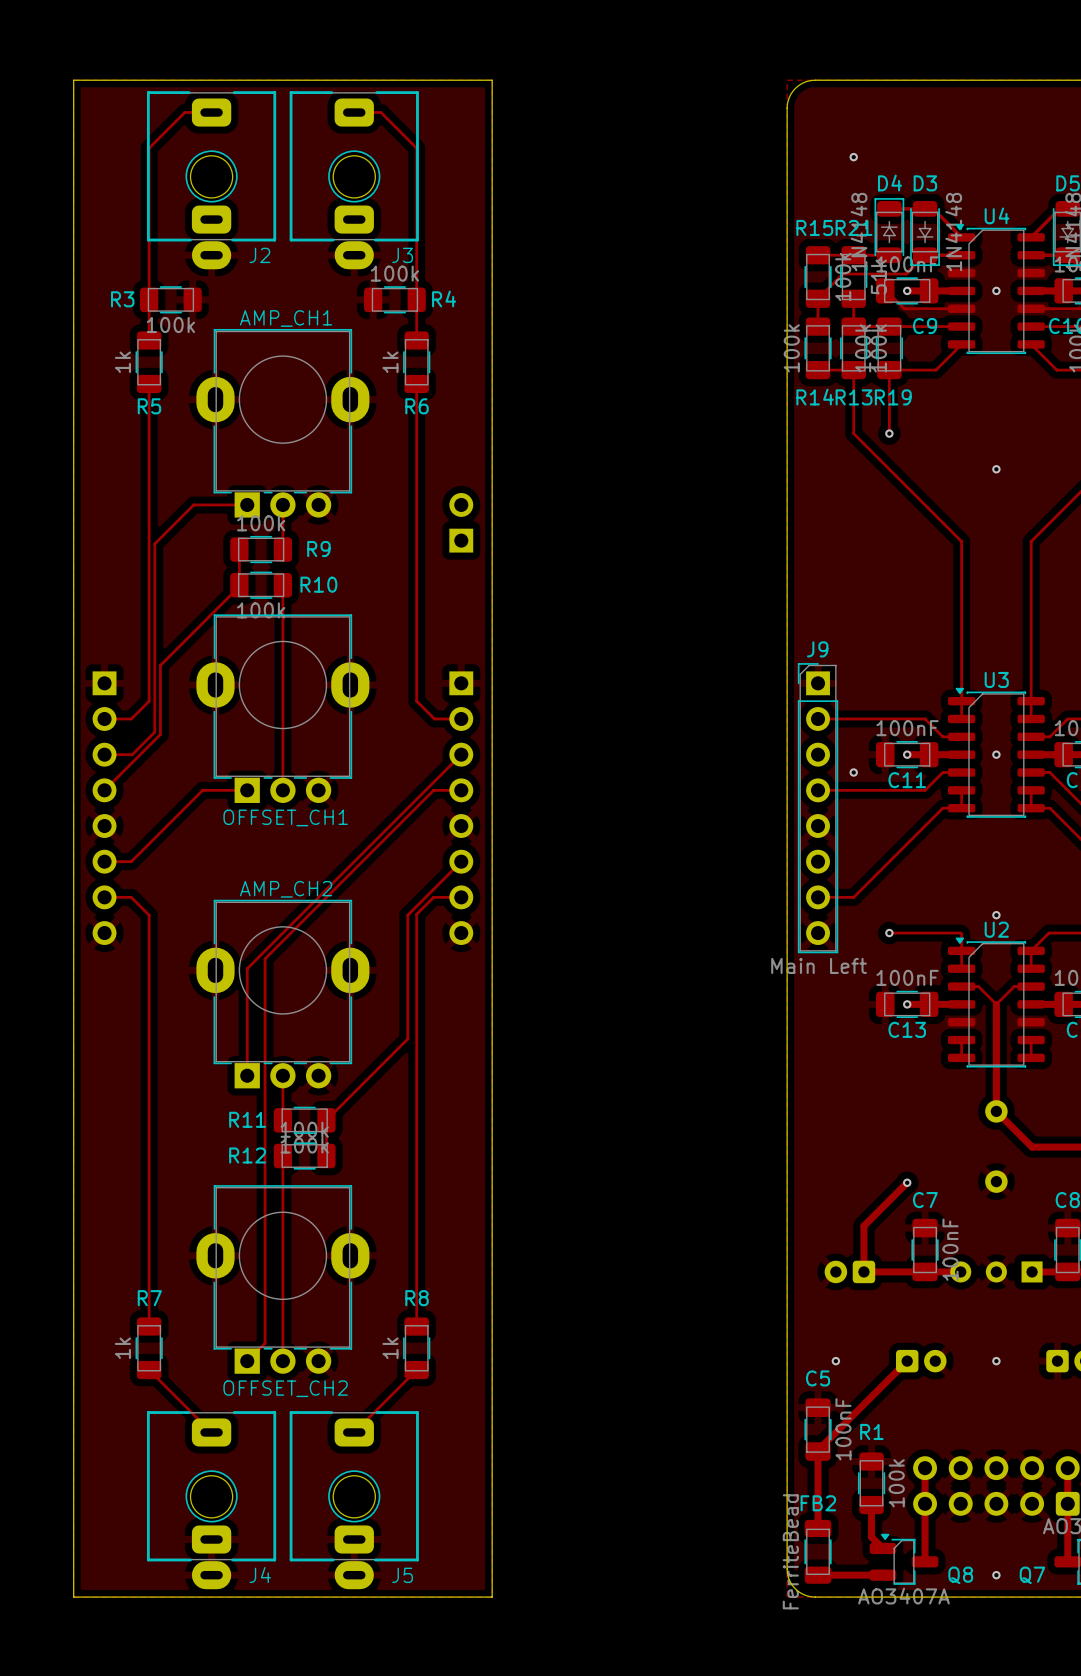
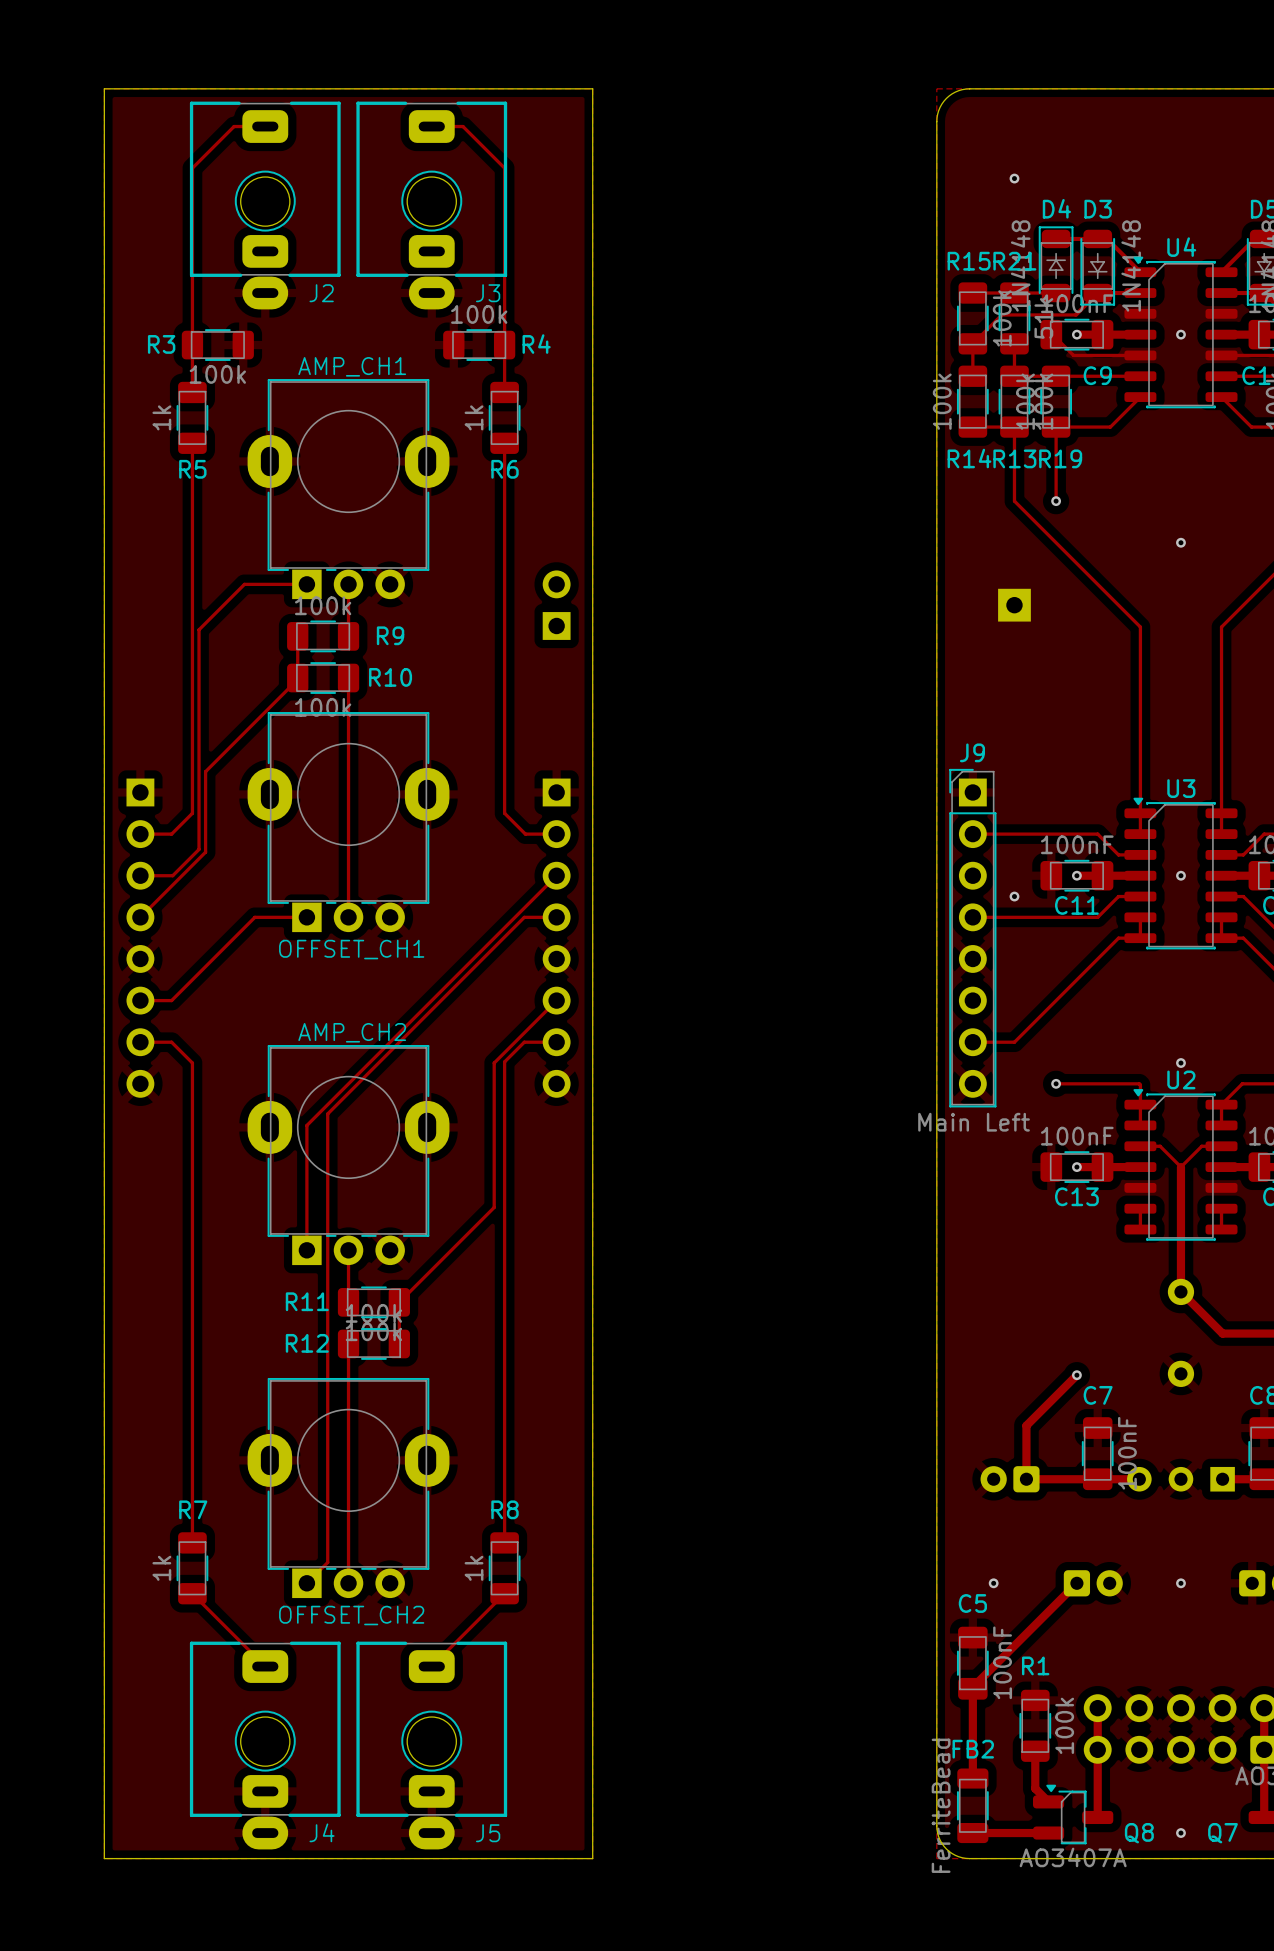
part: none -> (1014, 605)

